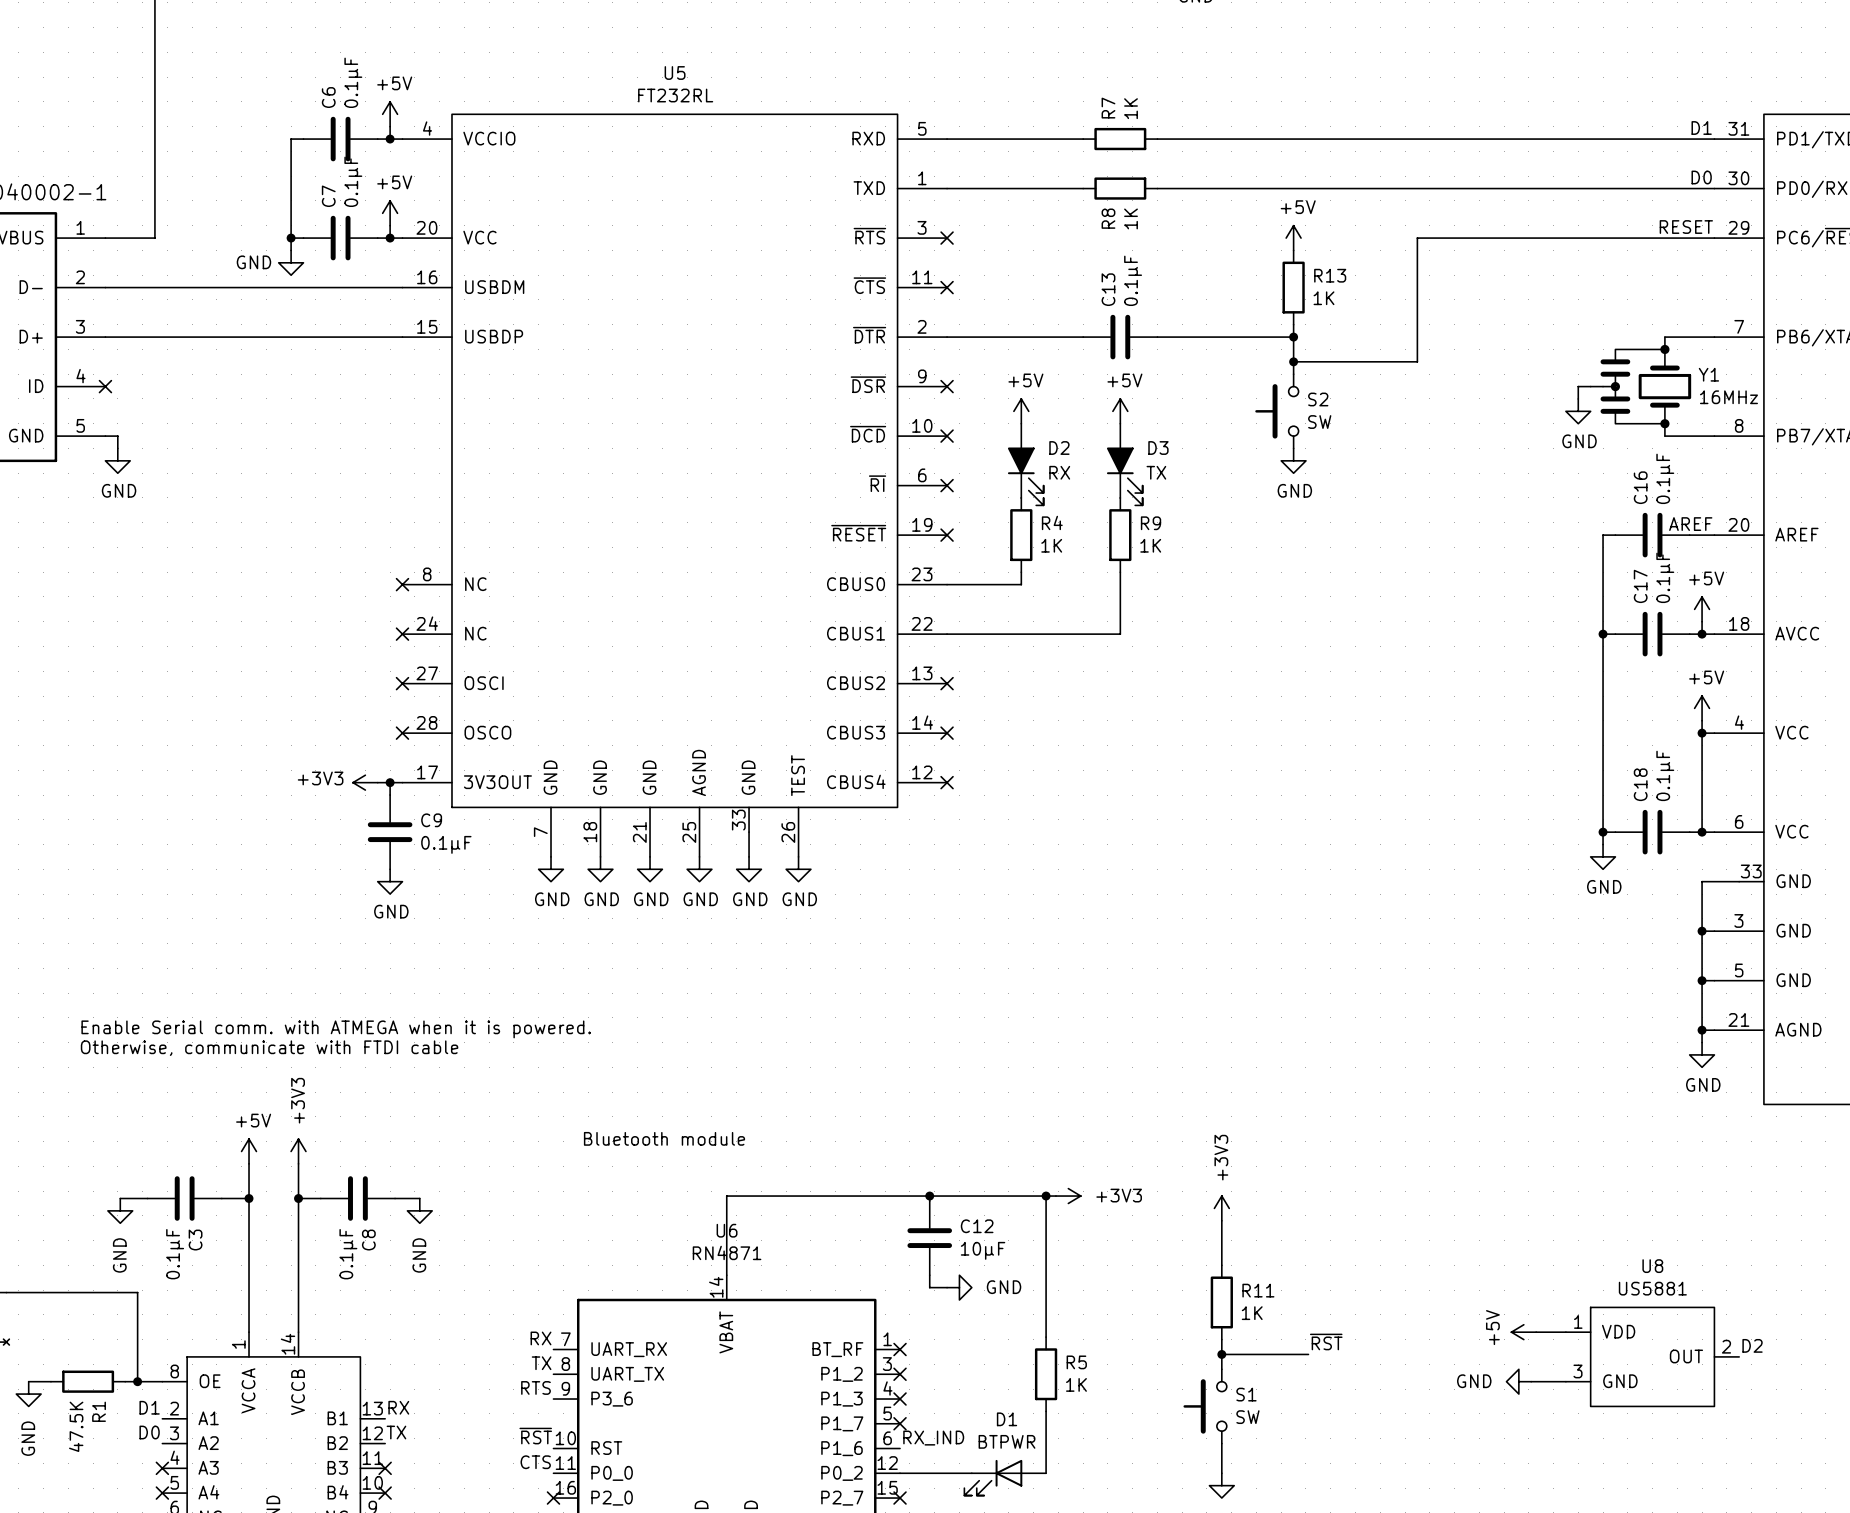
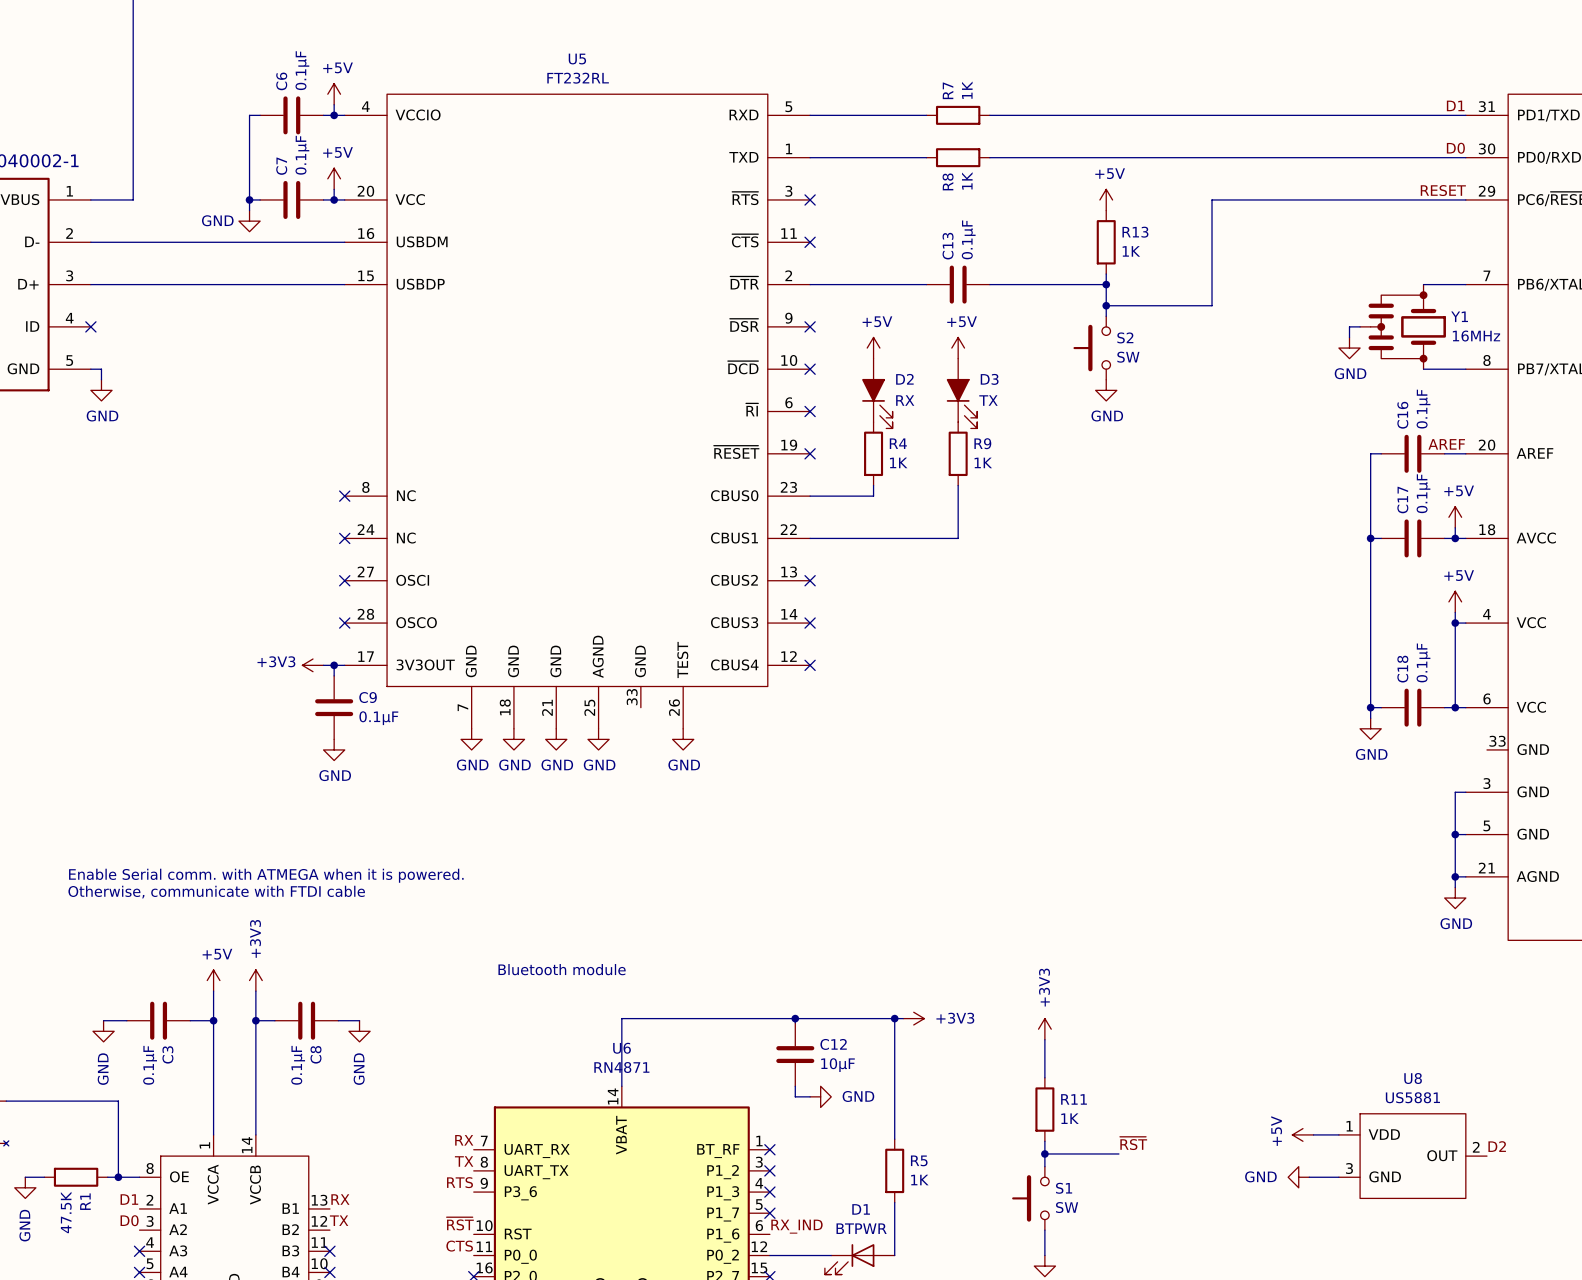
wire: (749, 832) (749, 856) -> none
power symbol: GND (749, 869) -> none
wire: (1739, 881) (1702, 881) (1702, 931) -> none
junction: (1702, 931) -> none

